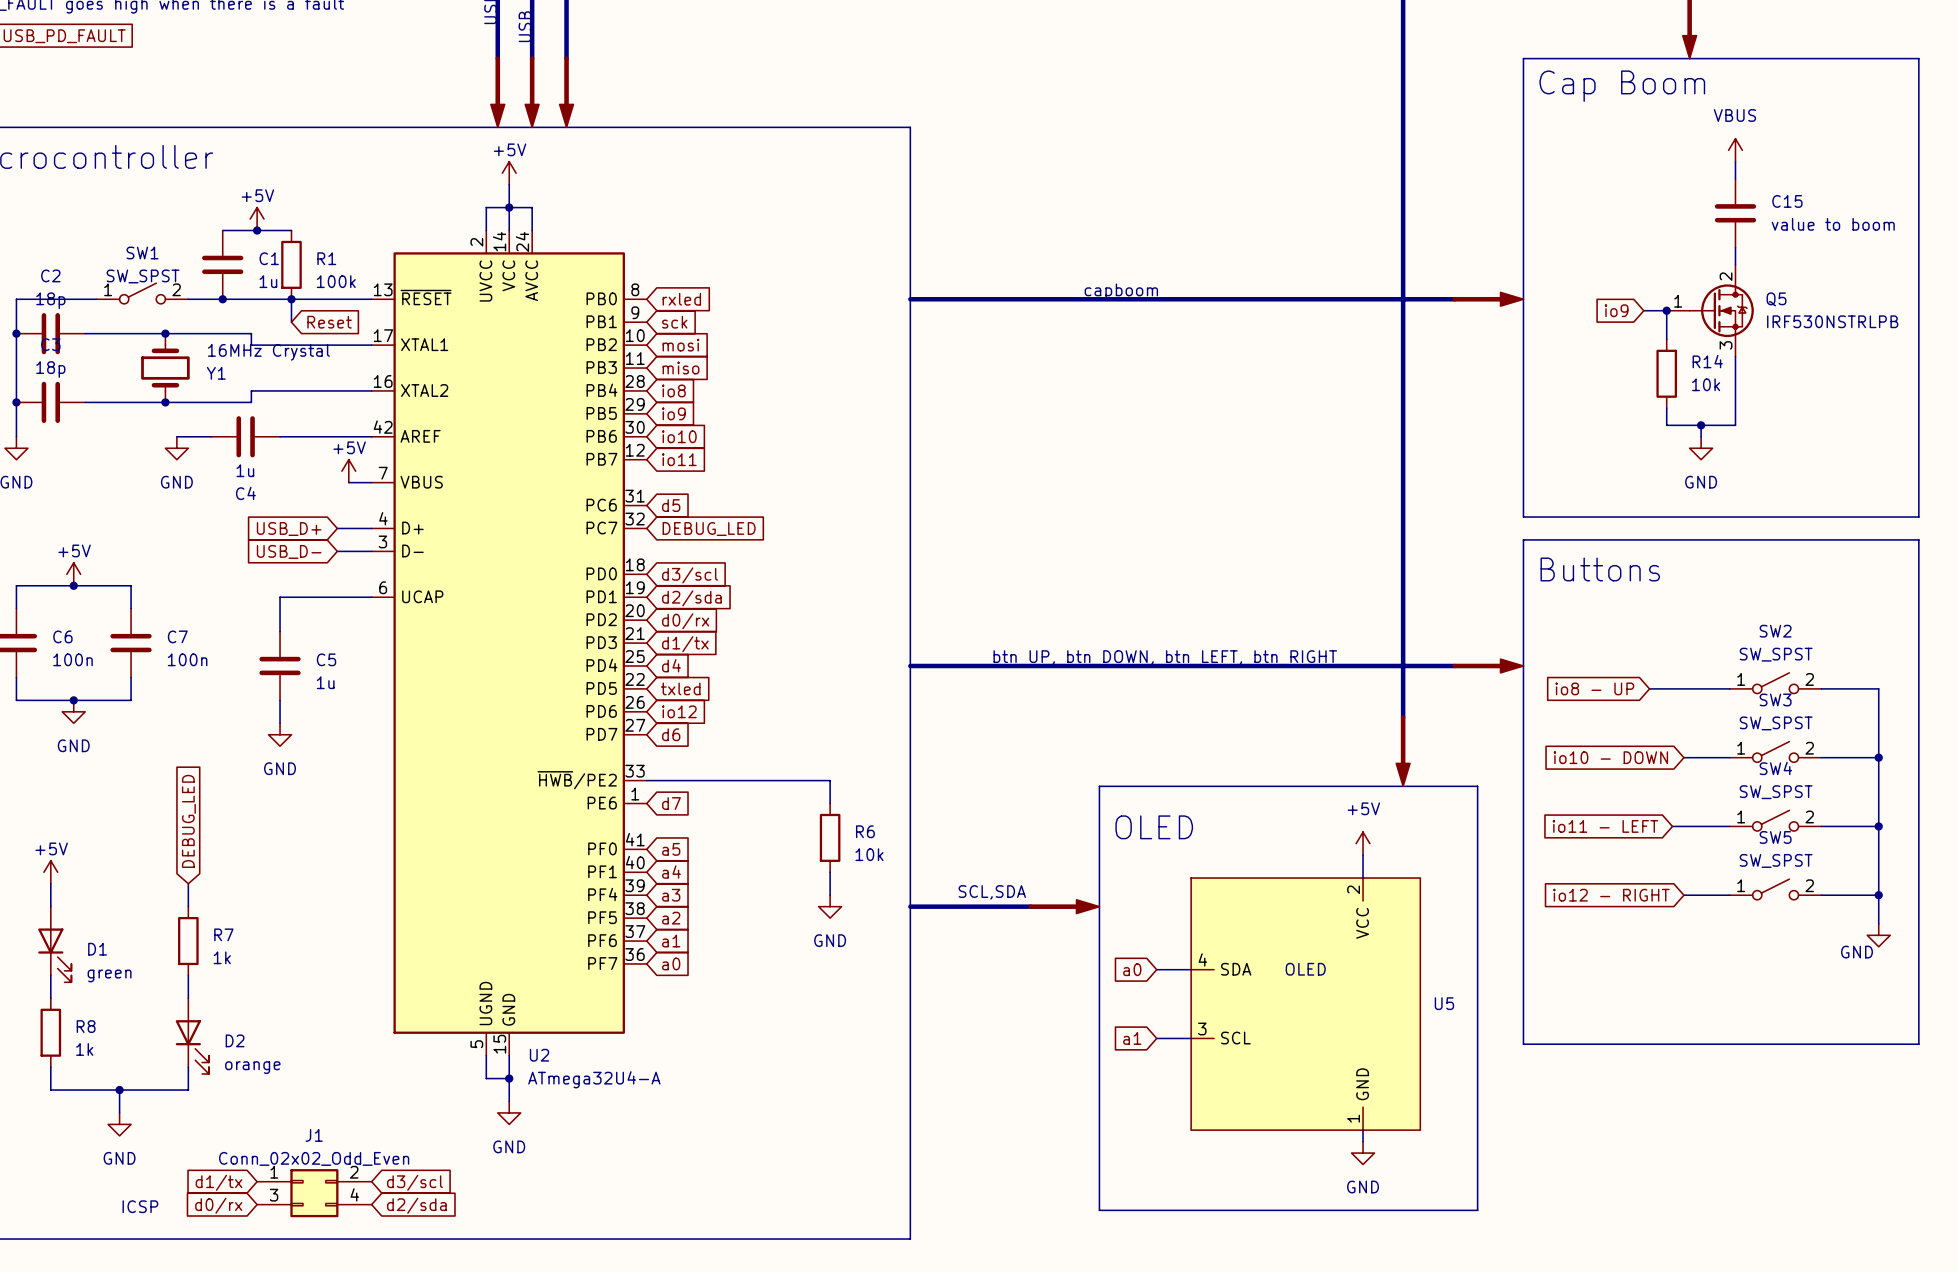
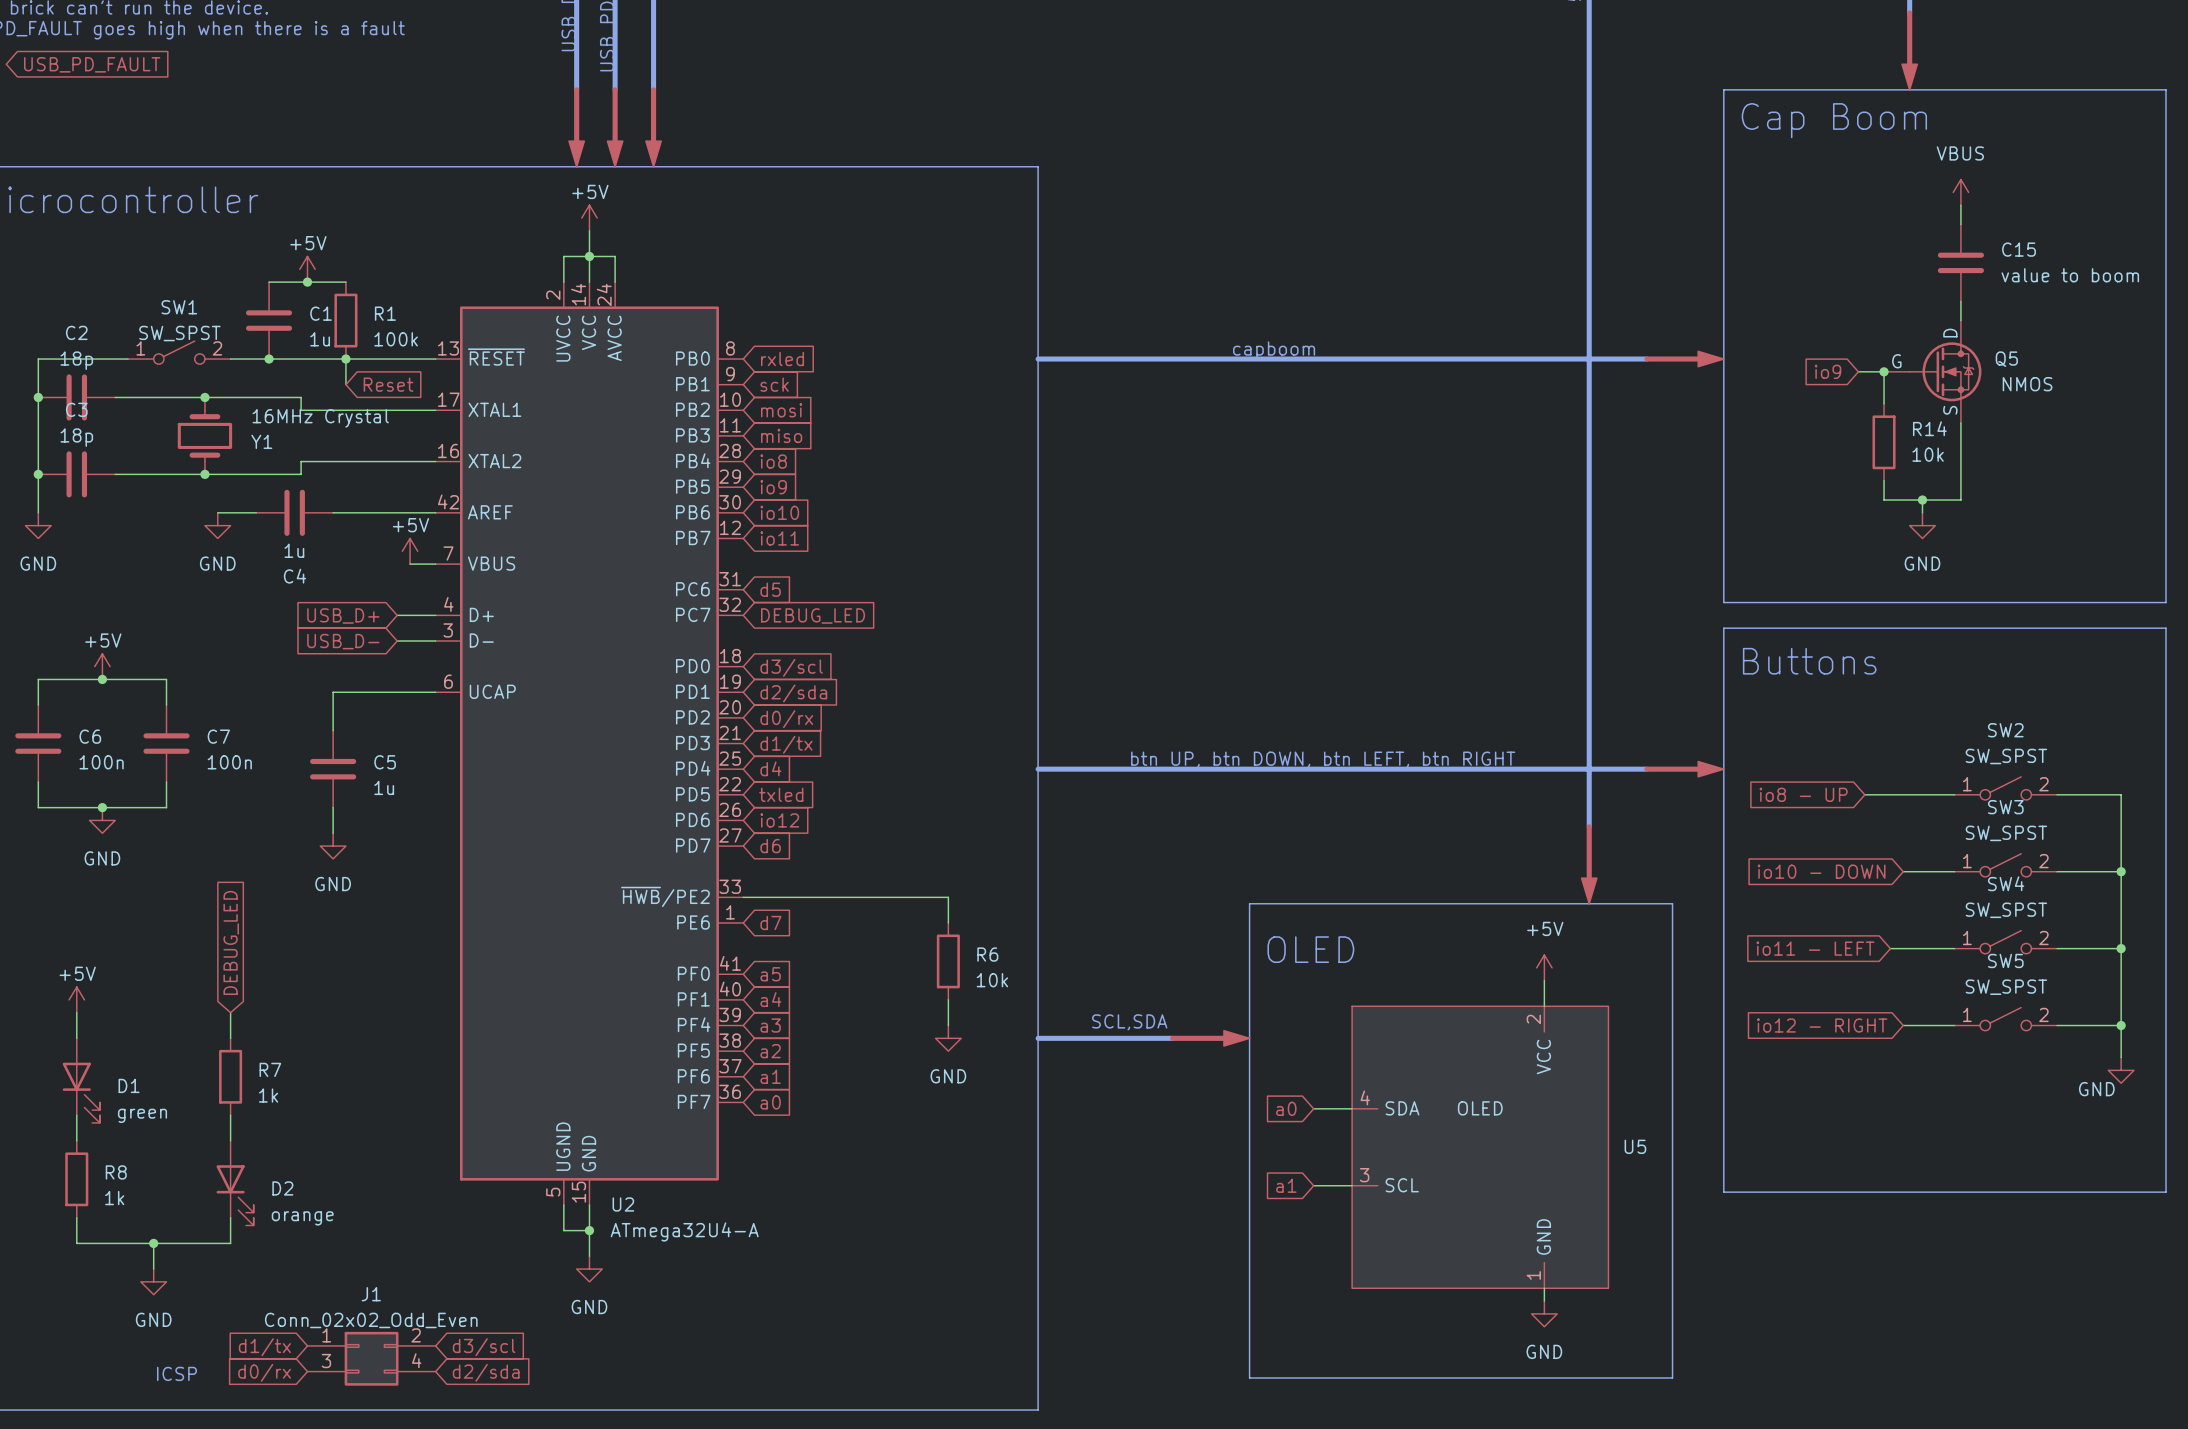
Q5 pin name: none -> D (1950, 333)
Q5 pin number: 2 (1726, 276) -> none
Q5 pin name: none -> G (1896, 361)
Q5 pin number: 1 (1678, 301) -> none
Q5 value: IRF530NSTRLPB (1832, 321) -> NMOS (2027, 384)
Q5 pin name: none -> S (1950, 410)
Q5 pin number: 3 (1726, 345) -> none

